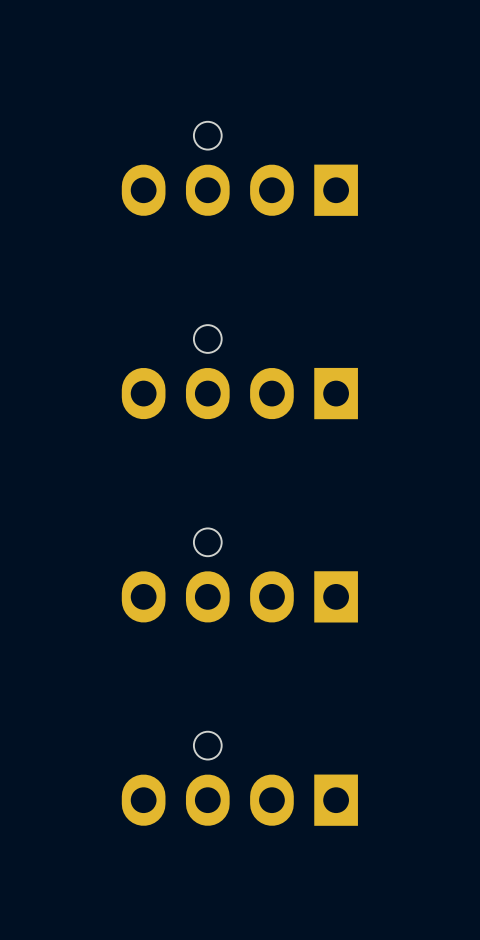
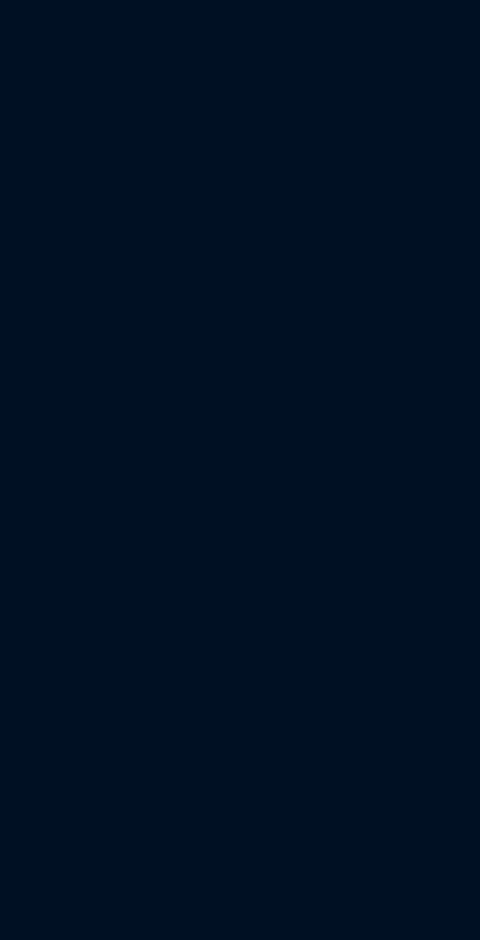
part: (239, 168) -> none
part: (239, 372) -> none
part: (239, 575) -> none
part: (239, 778) -> none

